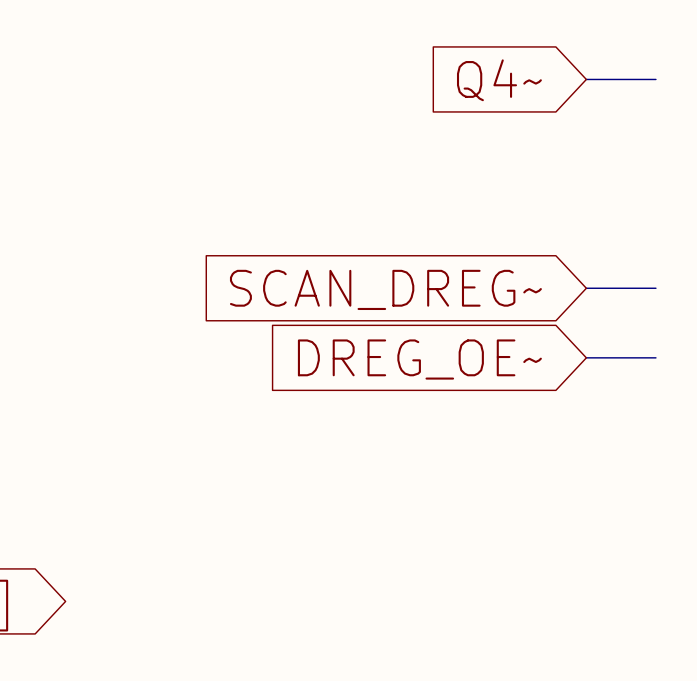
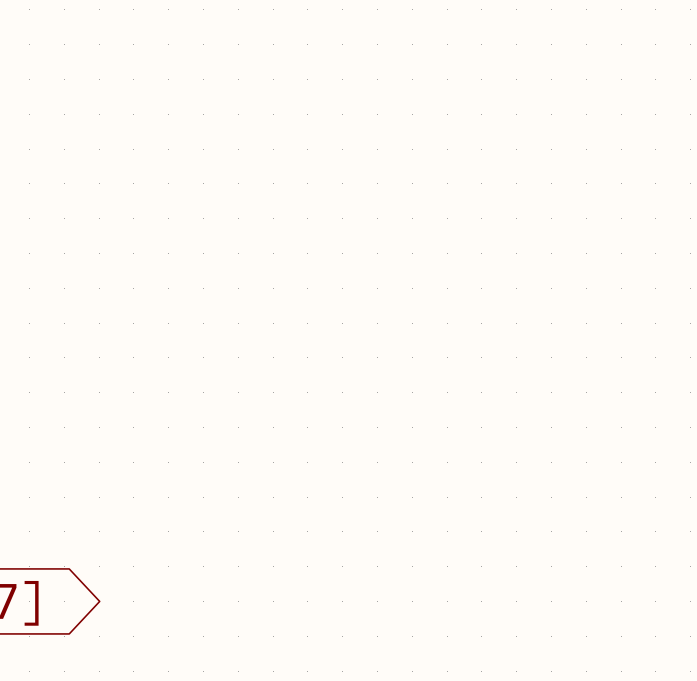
wire: (586, 79) (655, 79) -> none
global label: Q4~ (499, 80) -> none
wire: (586, 288) (655, 288) -> none
global label: SCAN_DREG~ (385, 289) -> none
wire: (586, 357) (655, 357) -> none
global label: DREG_OE~ (419, 359) -> none

